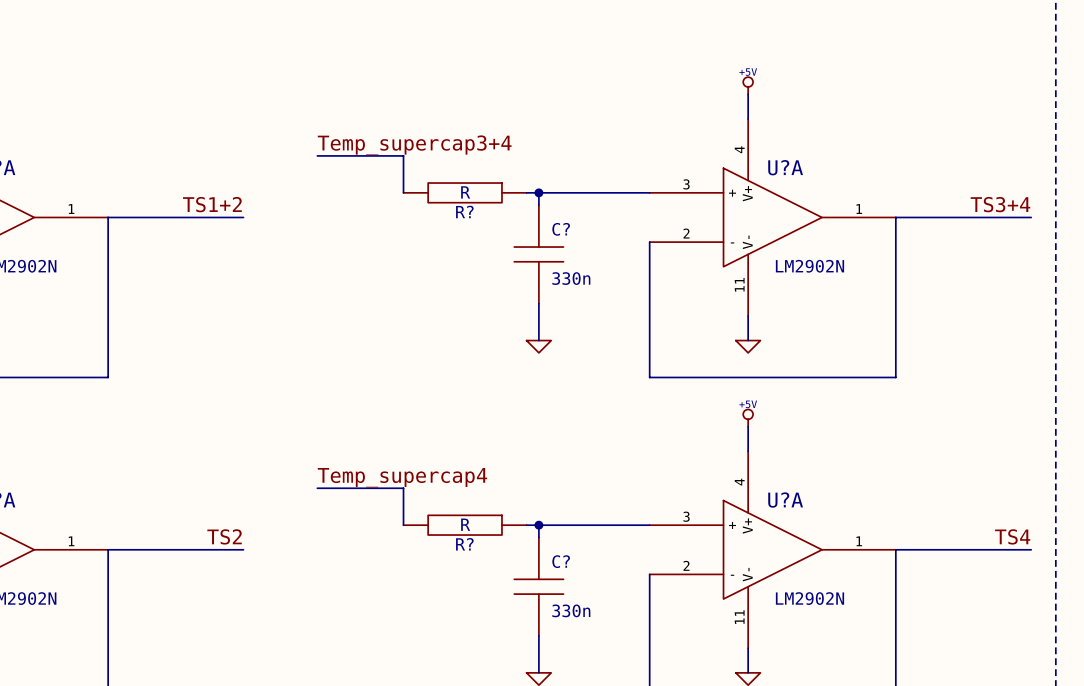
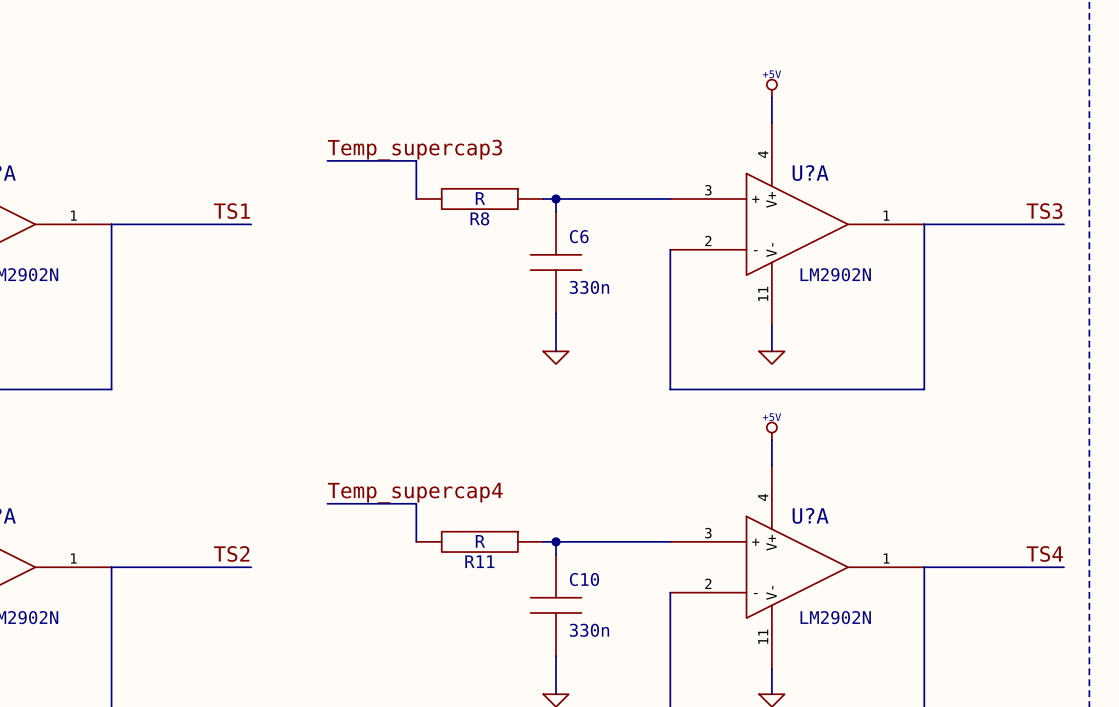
label: Temp_supercap3+4 (414, 145) -> Temp_supercap3 (414, 149)
label: TS1+2 (212, 204) -> TS1 (231, 211)
label: TS3+4 (1000, 204) -> TS3 (1044, 211)
R? name: R? (464, 211) -> R8 (479, 218)
C? name: C? (561, 229) -> C6 (579, 236)
R? name: R? (464, 544) -> R11 (479, 561)
C? name: C? (561, 561) -> C10 (584, 579)

